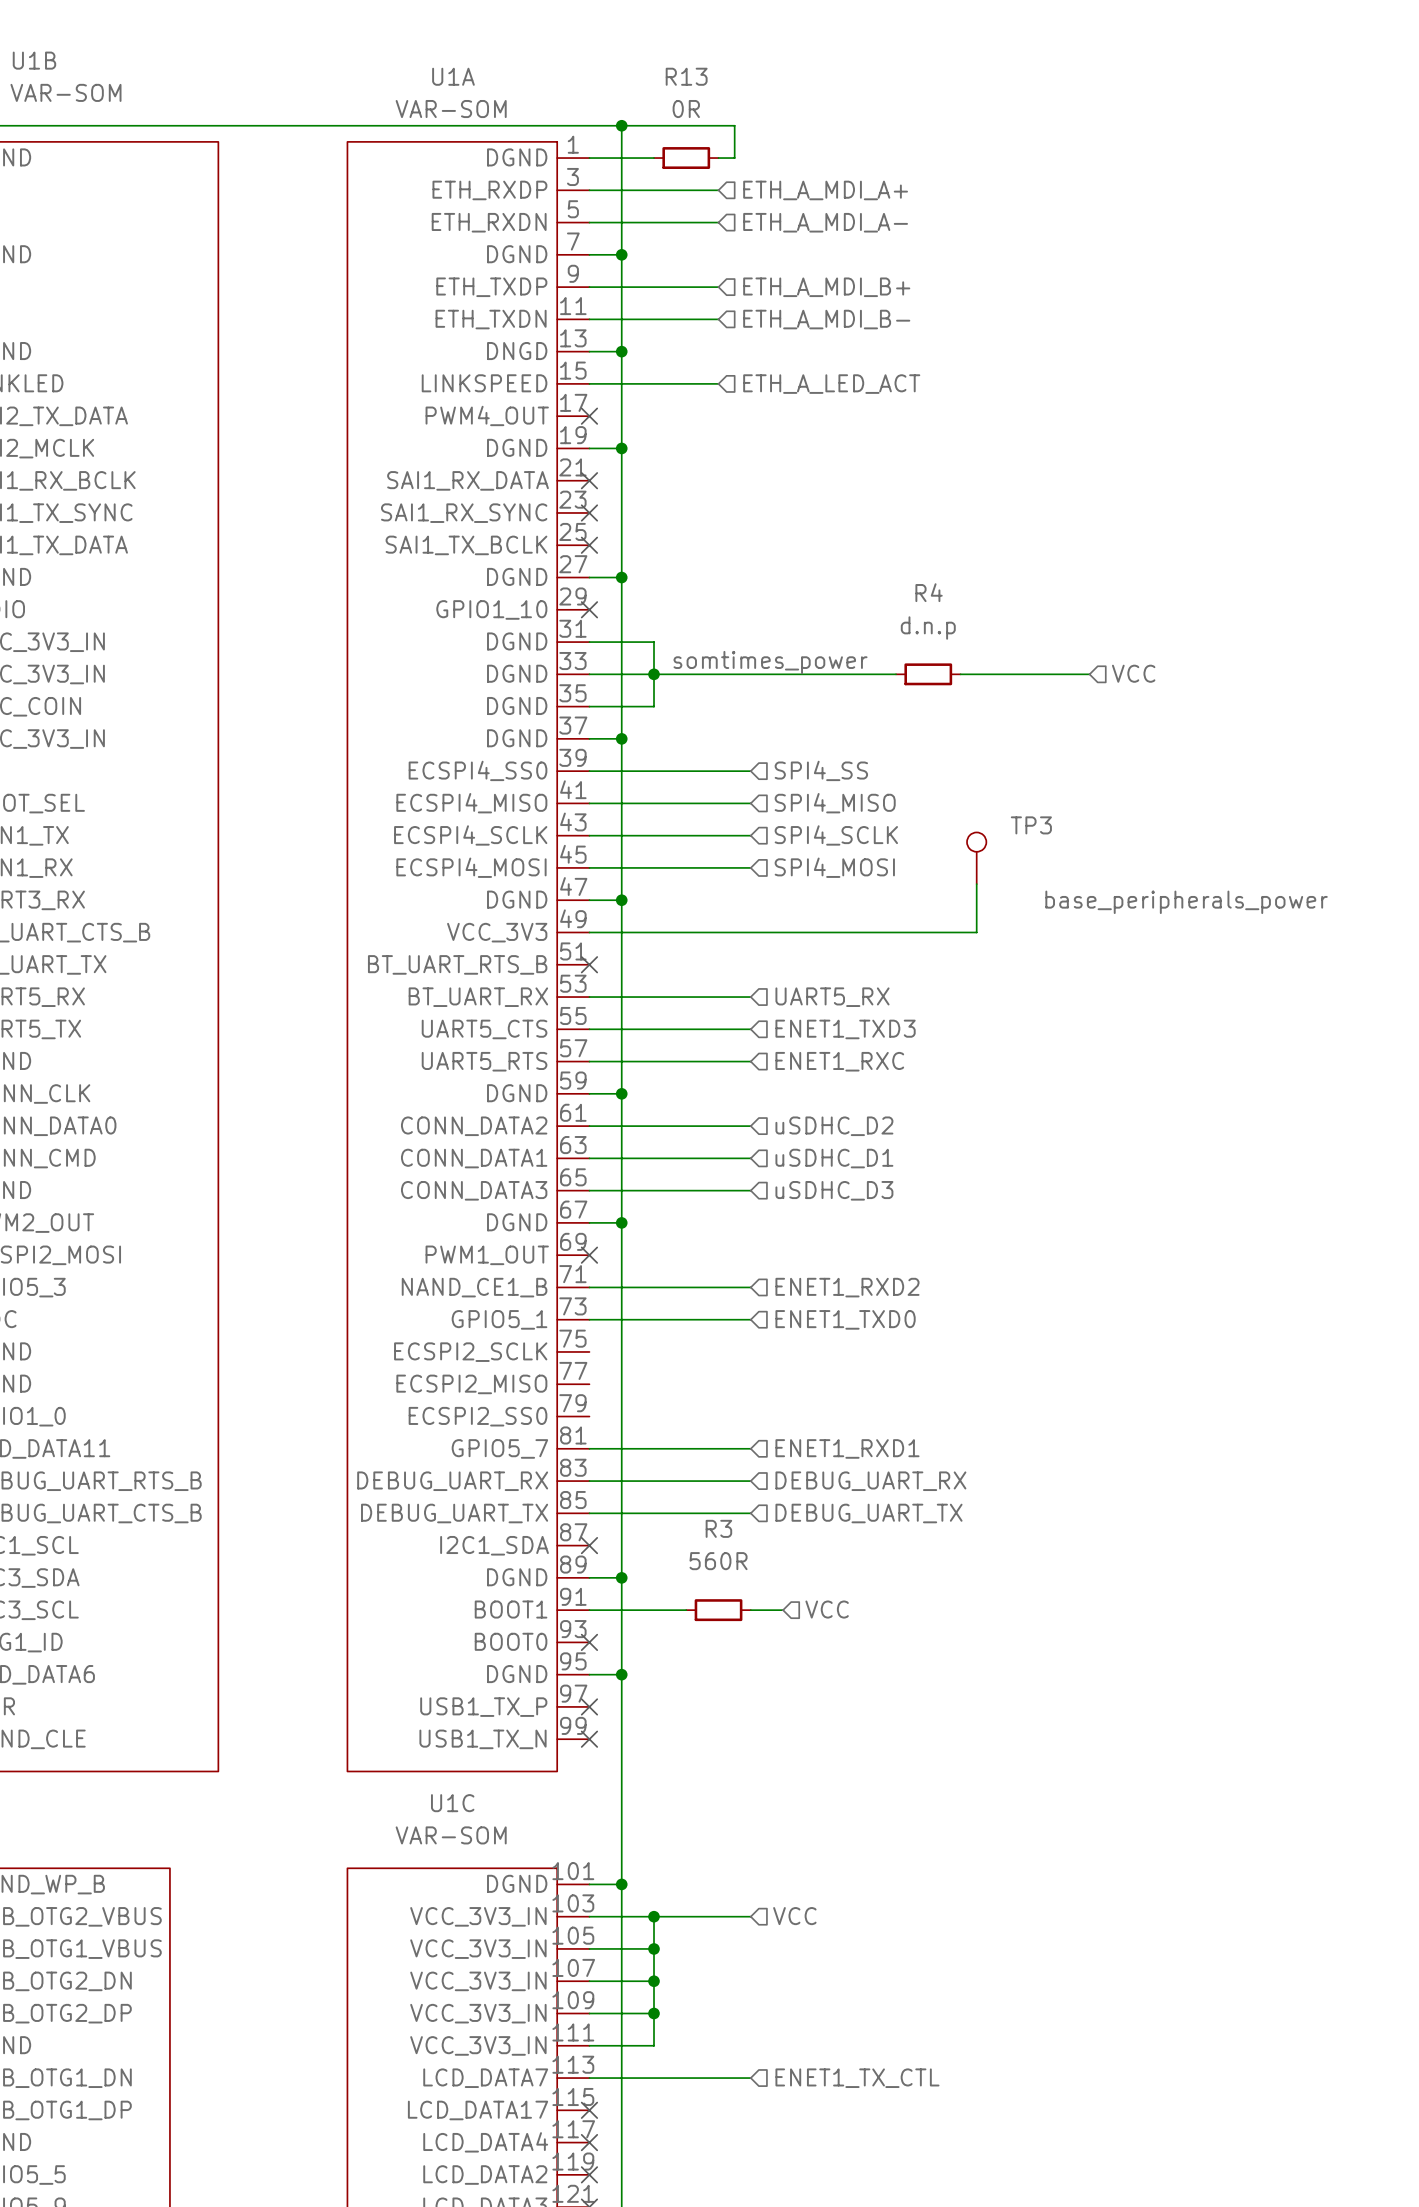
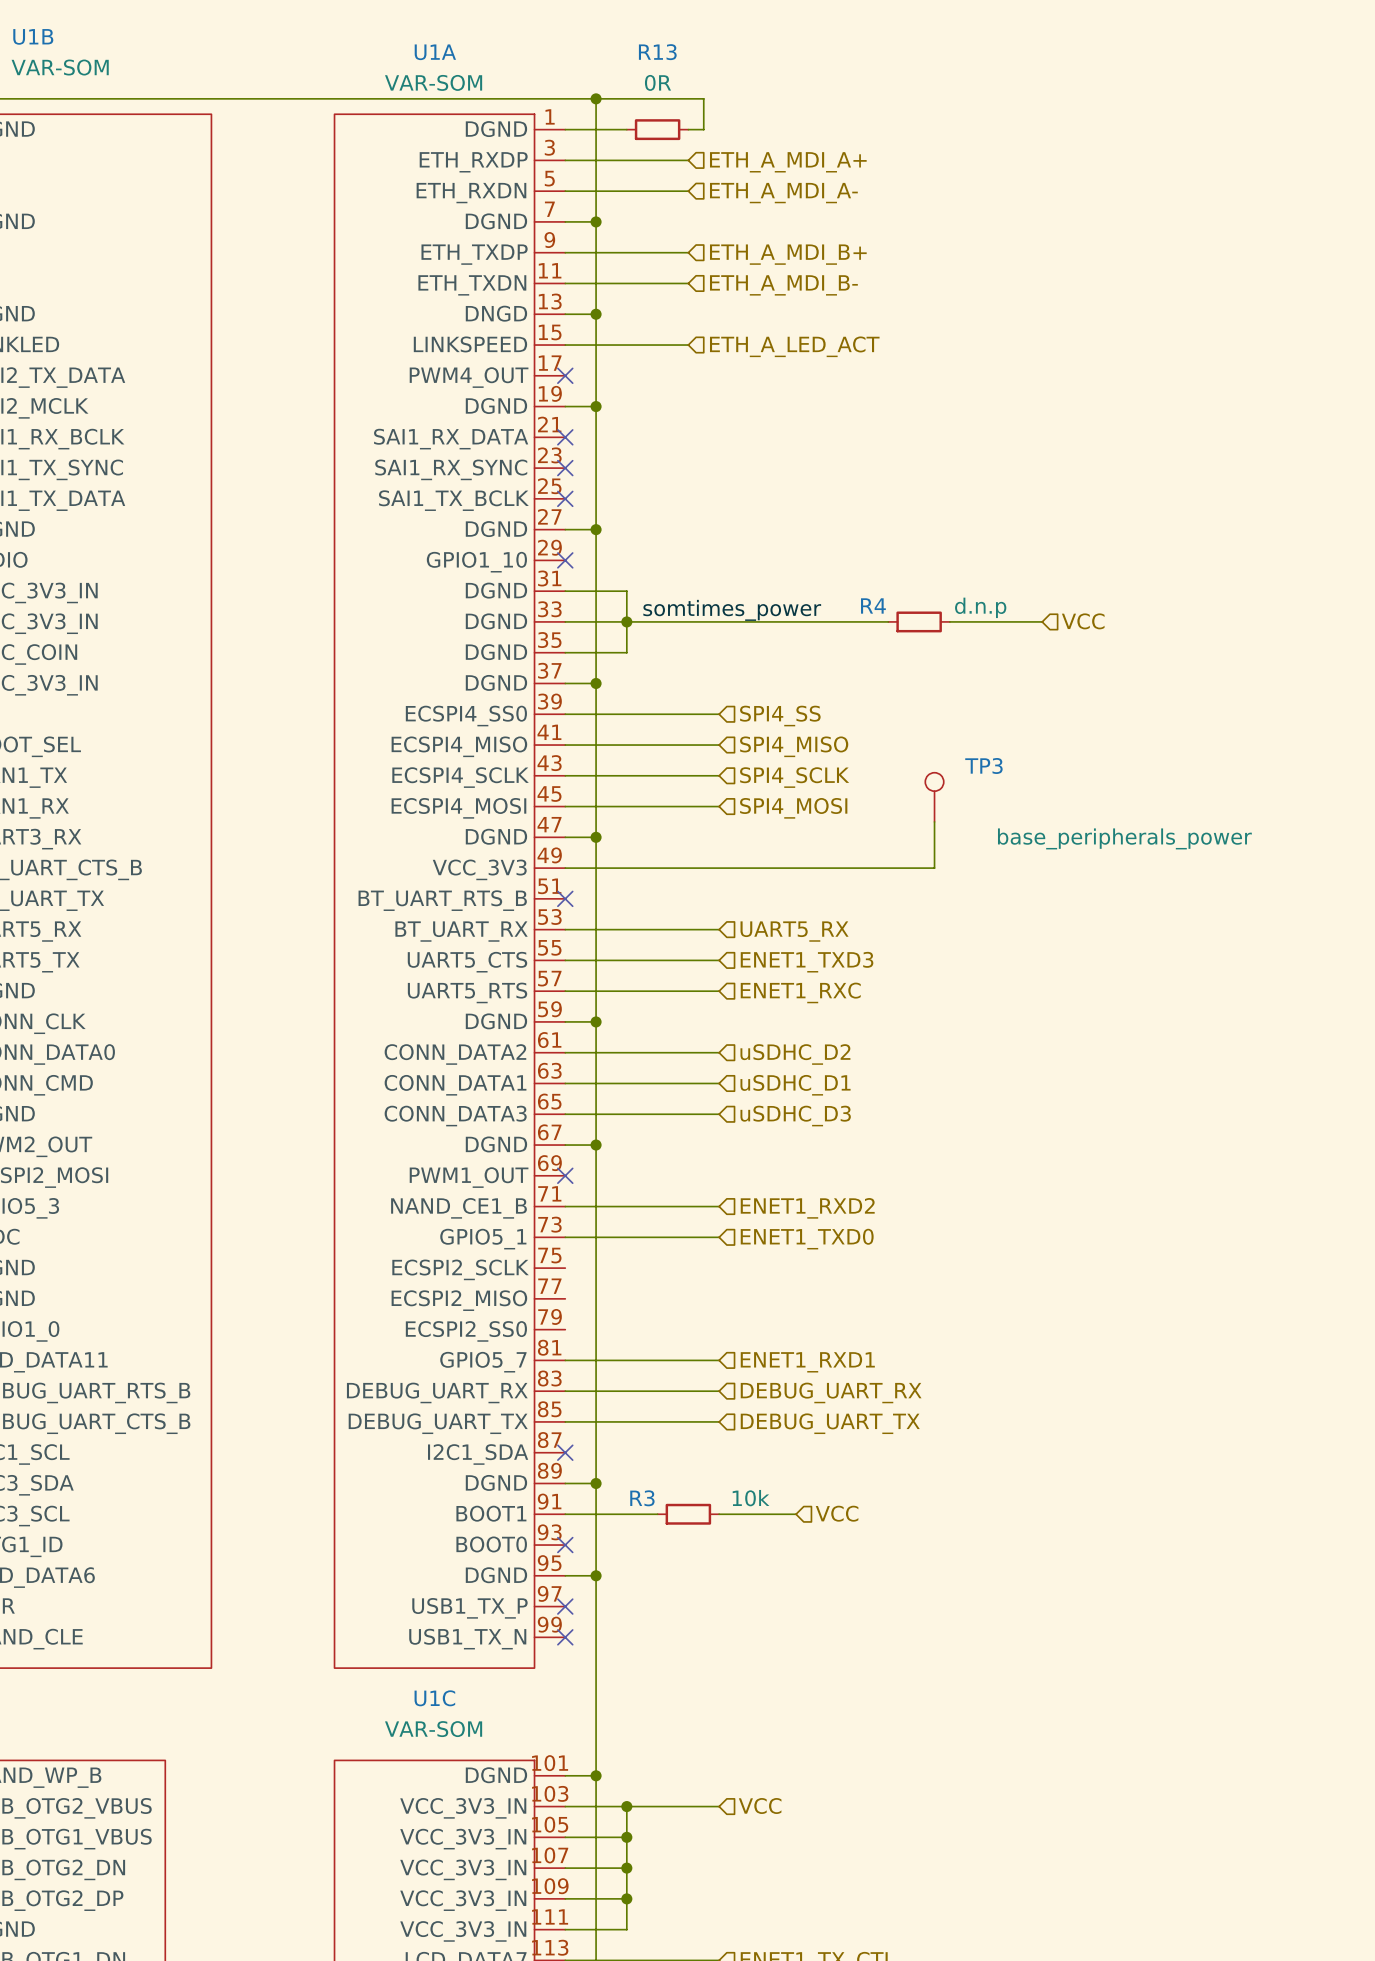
R4 name position: R4 (929, 592) -> R4 (873, 605)
R4 value position: d.n.p (928, 628) -> d.n.p (980, 607)
R4 position: (928, 674) -> (919, 621)
wire: (960, 674) (992, 674) -> (857, 621) (888, 621)
R3 name position: R3 (718, 1528) -> R3 (642, 1498)
R3 value: 560R (718, 1561) -> 10k (751, 1498)
hierarchical label position: VCC (827, 1609) -> VCC (837, 1513)
wire: none -> (749, 1514) (796, 1514)

